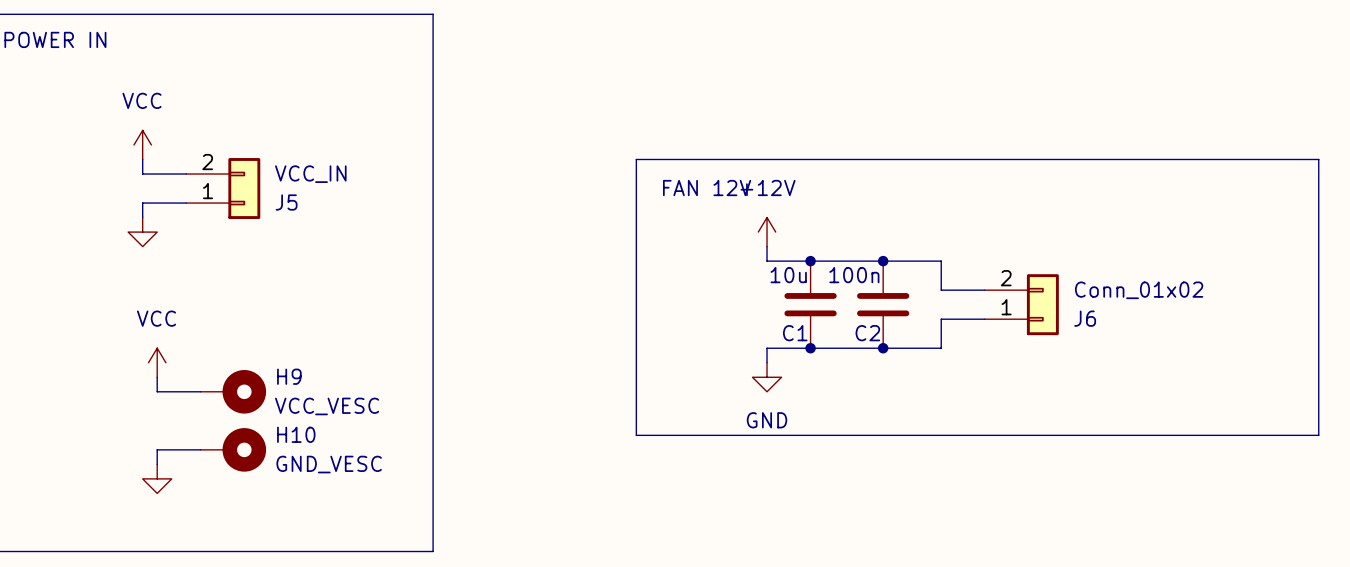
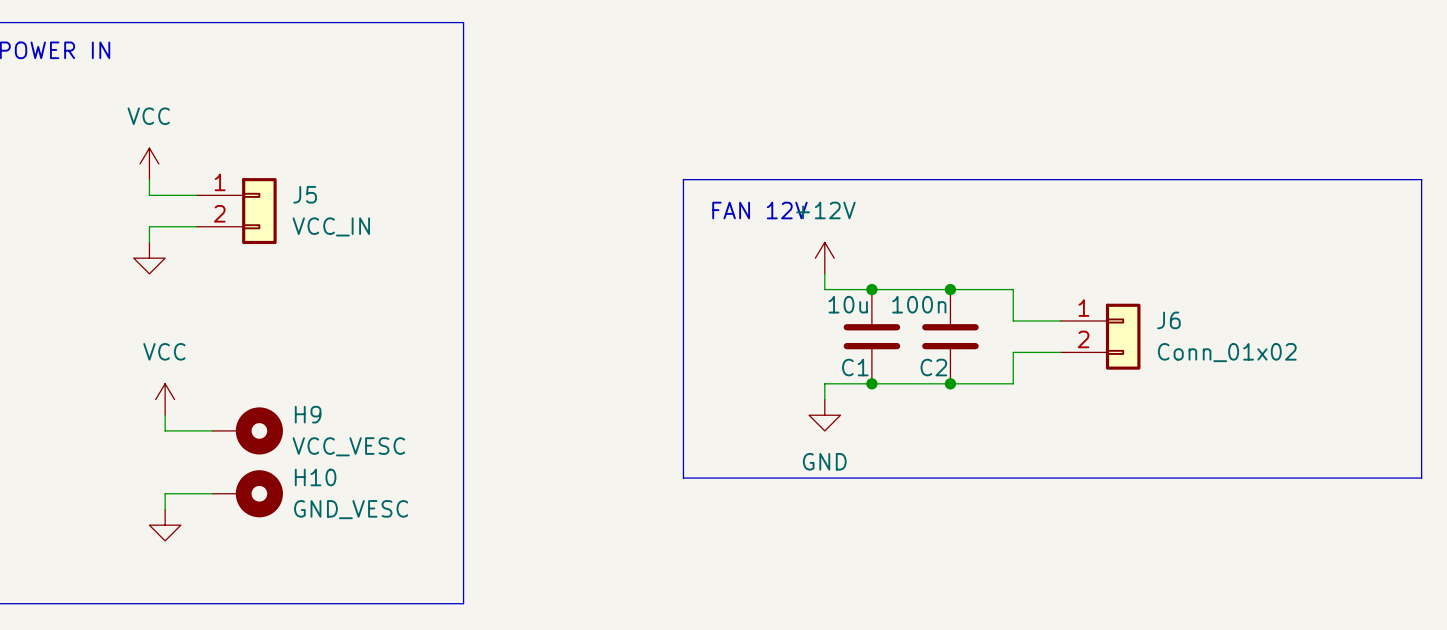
J5 flip: as is (244, 188) -> up-down (259, 211)
J6 flip: as is (1042, 304) -> up-down (1123, 336)

